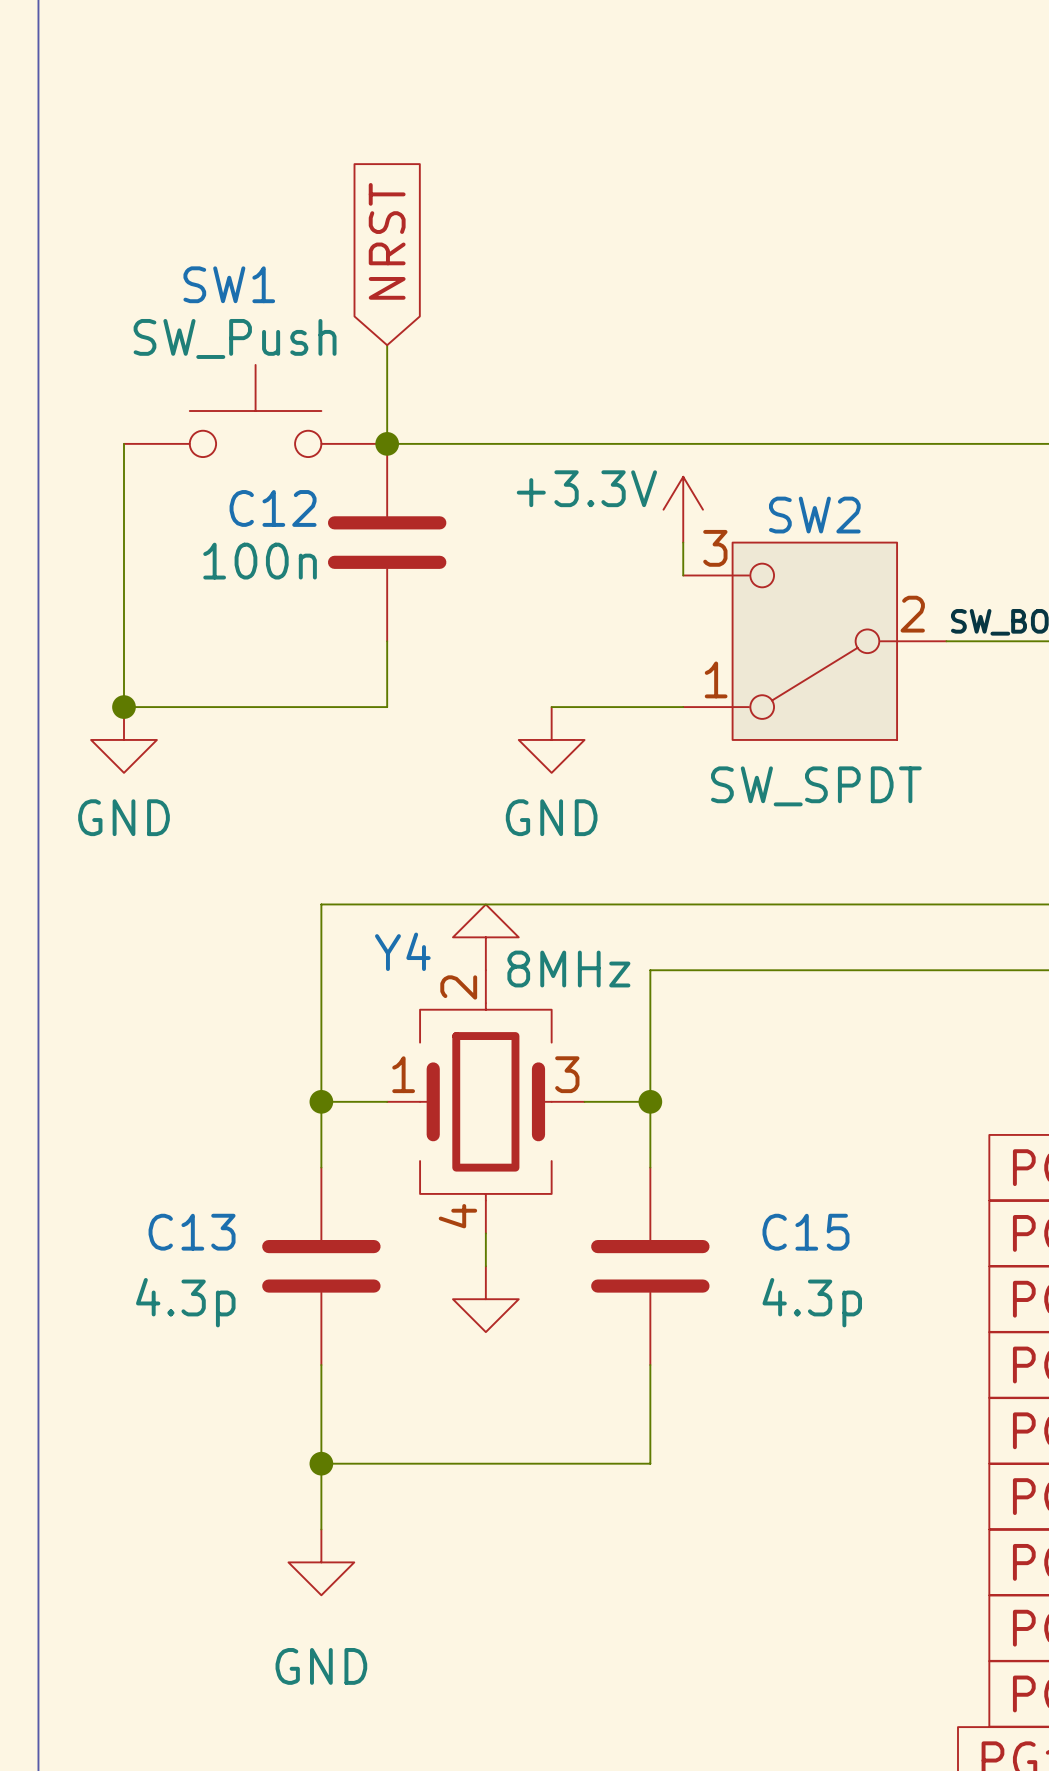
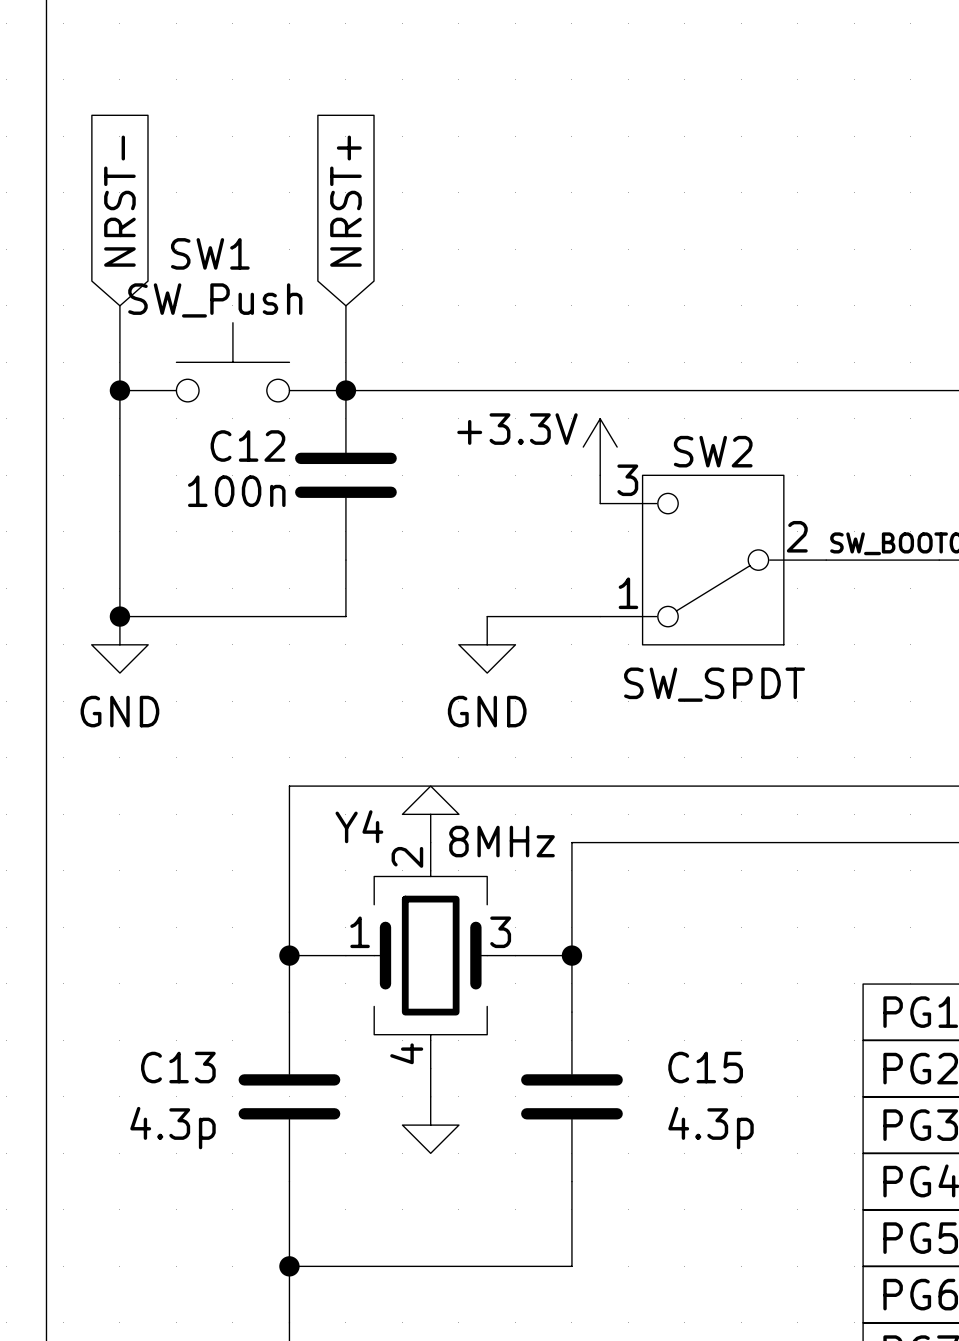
global label: none -> NRST- (119, 201)
global label: NRST (387, 241) -> NRST+ (345, 201)
wire: none -> (119, 305) (119, 390)
junction: none -> (119, 390)

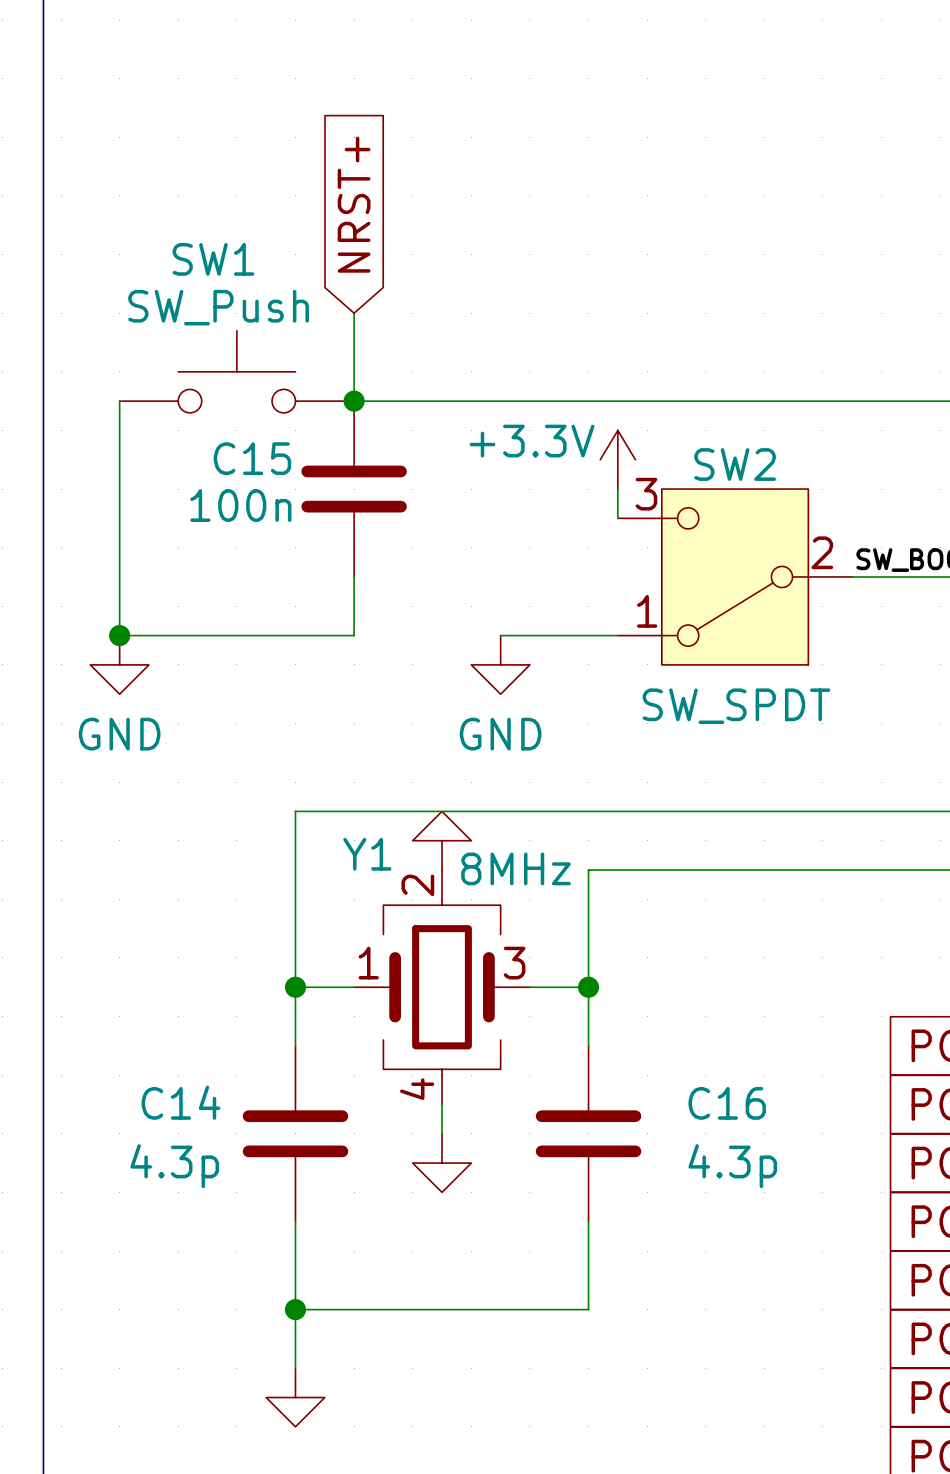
global label: NRST- (119, 201) -> none
wire: (119, 305) (119, 390) -> none
junction: (119, 390) -> none
C12 name: C12 (247, 446) -> C15 (252, 458)
Y4 name: Y4 (359, 826) -> Y1 (367, 854)
C13 name: C13 (178, 1067) -> C14 (180, 1102)
C15 name: C15 (705, 1067) -> C16 (727, 1103)

